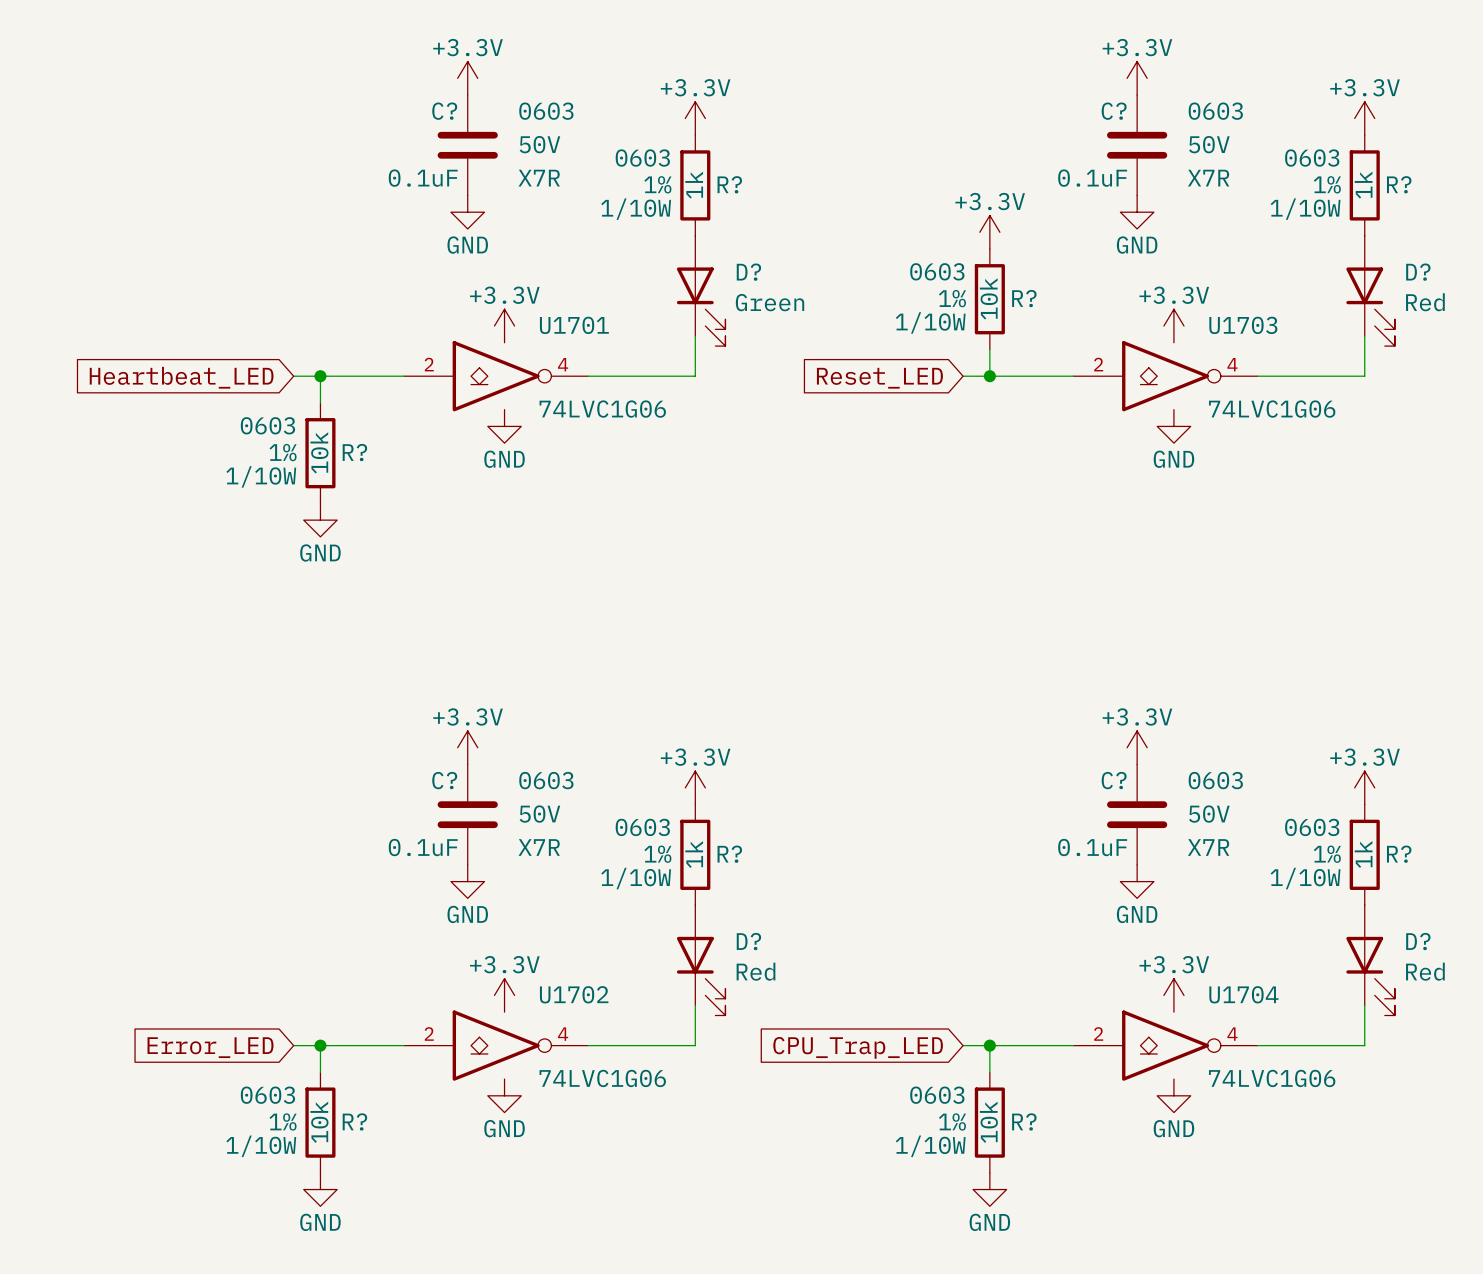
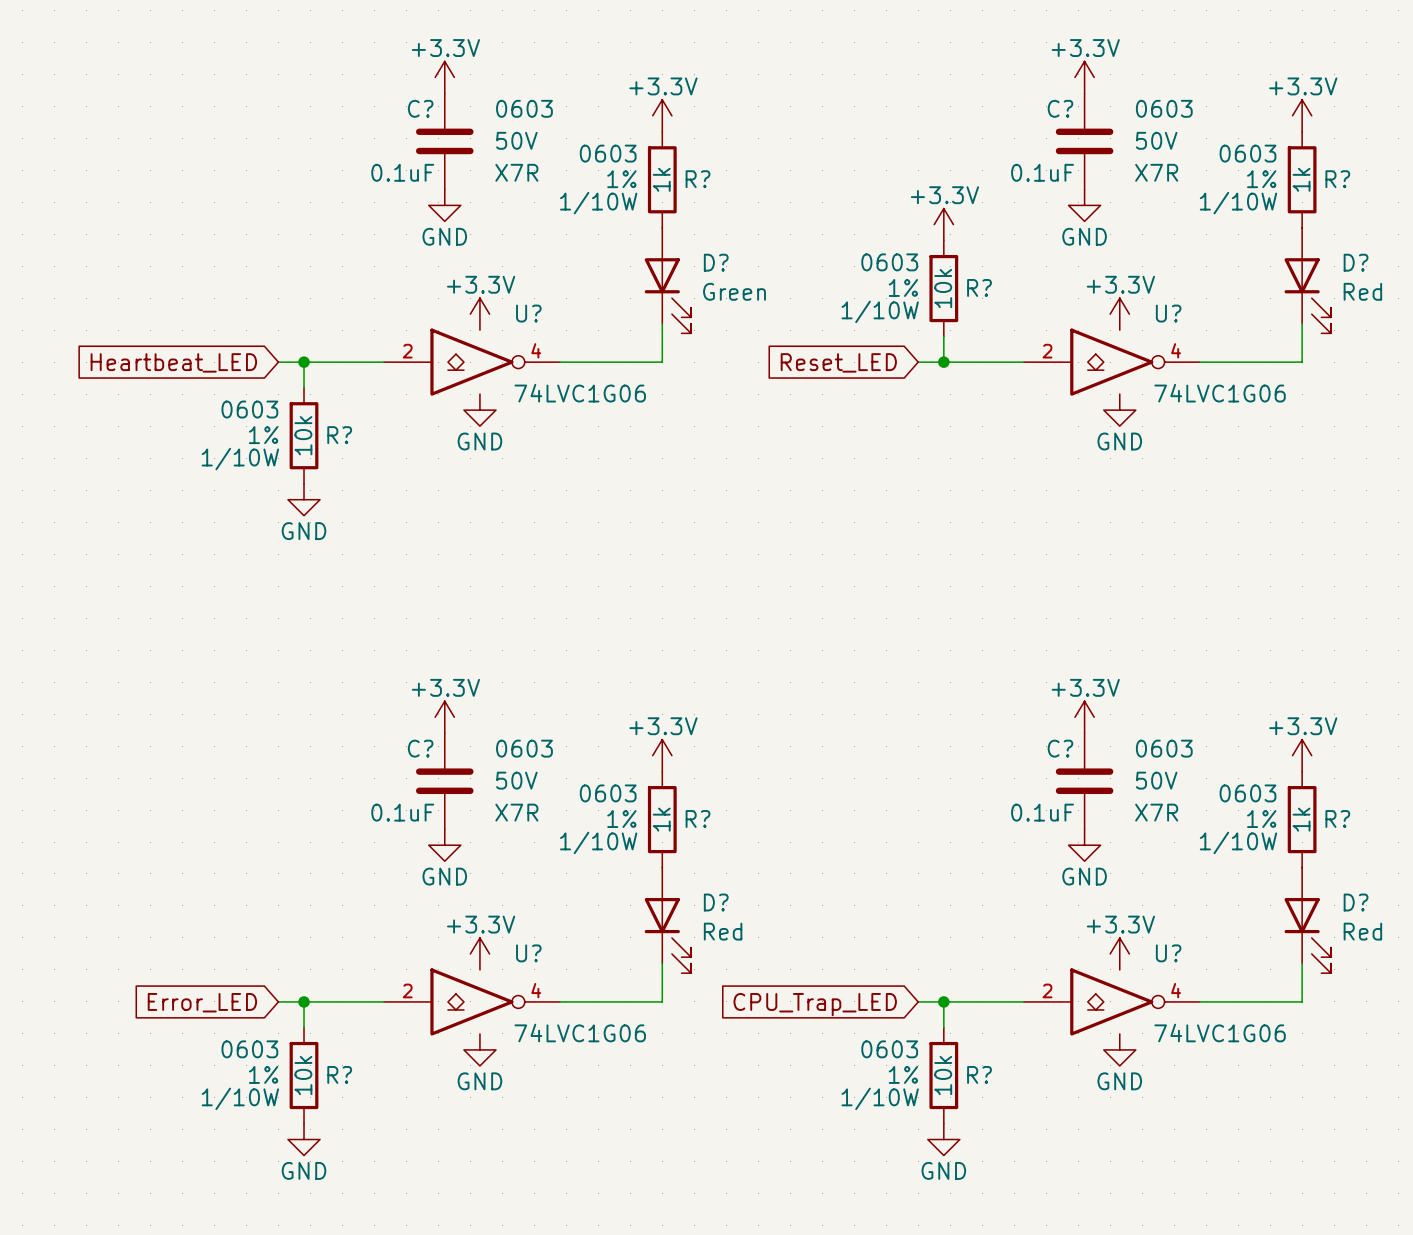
U1701 name: U1701 (574, 325) -> U? (528, 313)
U1703 name: U1703 (1243, 325) -> U? (1168, 313)
U1702 name: U1702 (574, 994) -> U? (528, 953)
U1704 name: U1704 (1243, 994) -> U? (1168, 953)

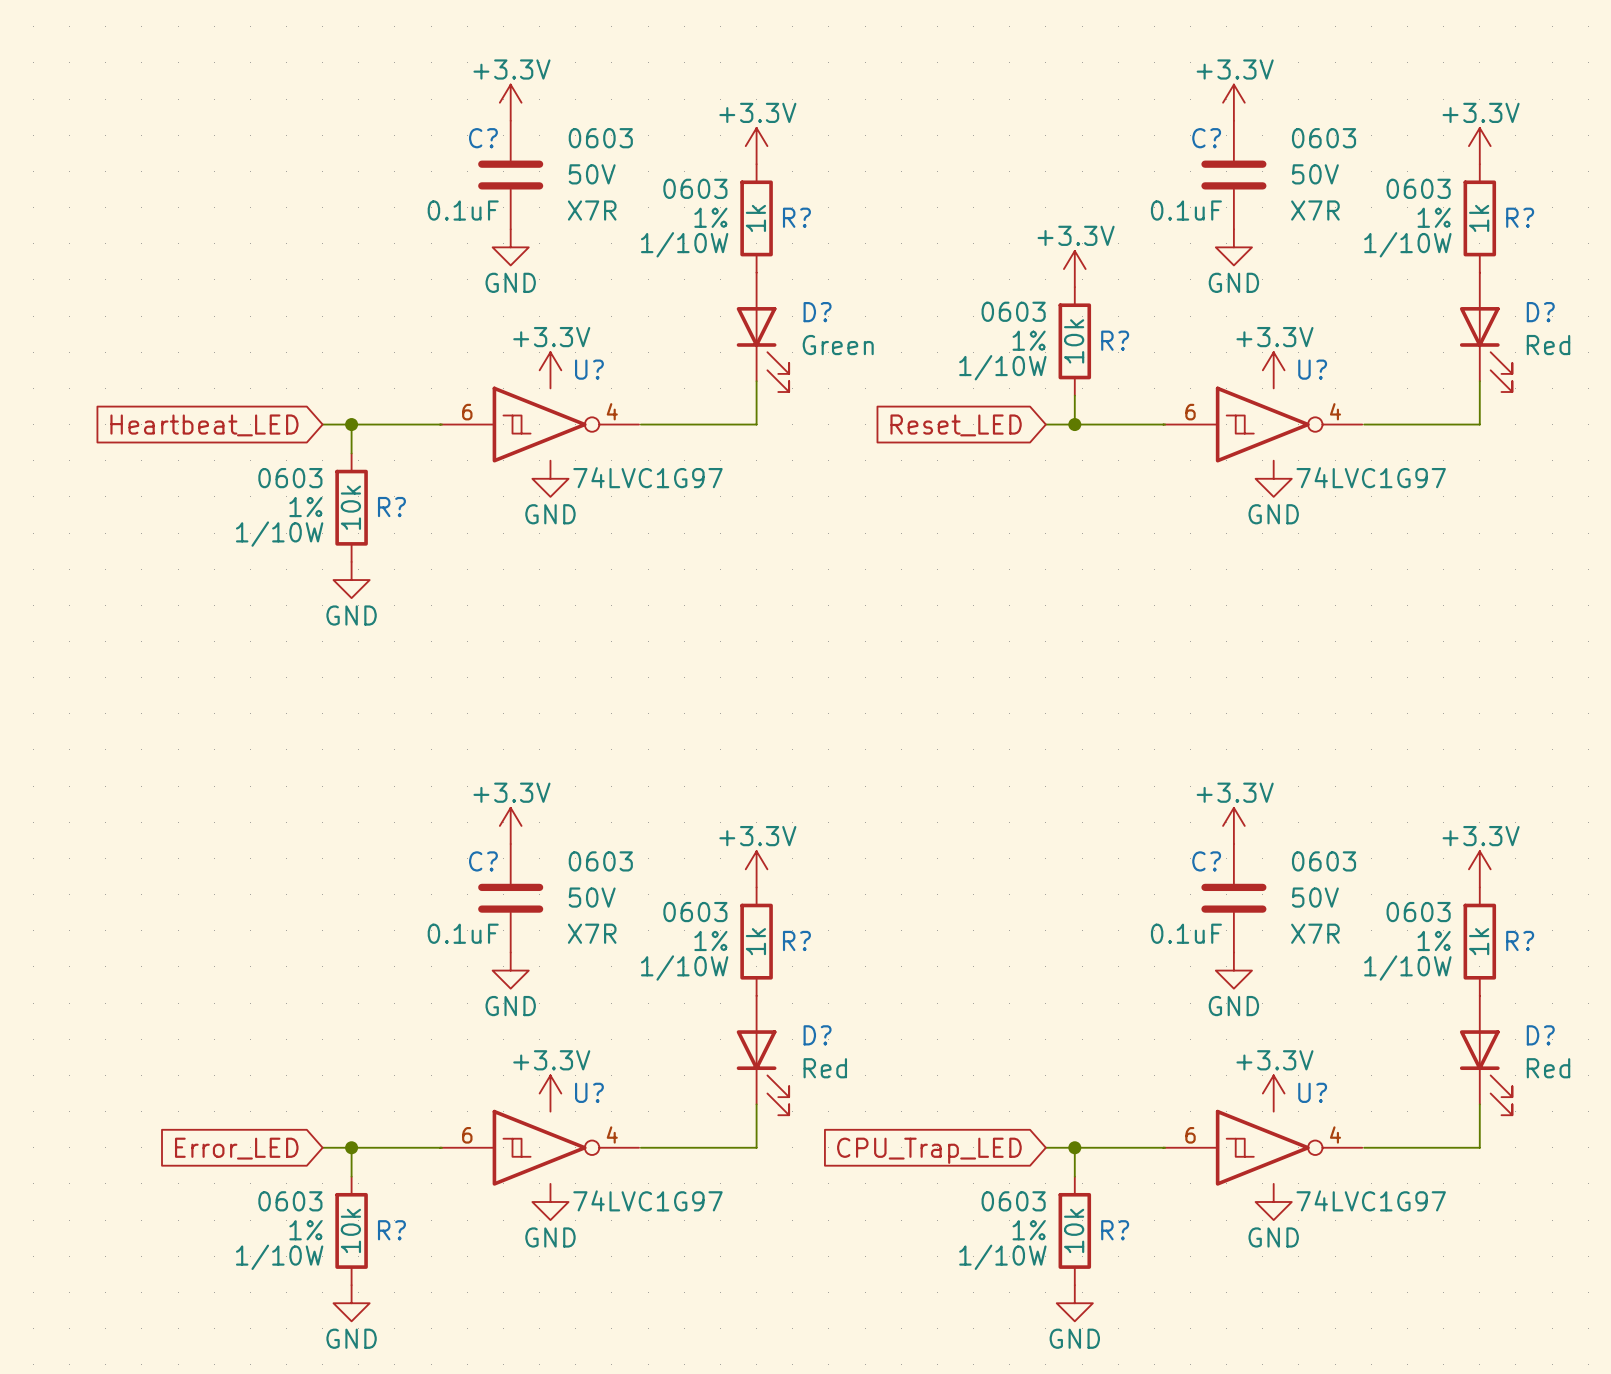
U? symbol: [383, 328, 560, 396] -> [440, 386, 640, 463]
U? symbol: [1023, 328, 1200, 396] -> [1163, 386, 1363, 463]
U? value: 74LVC1G06 (580, 393) -> 74LVC1G97 (647, 477)
U? value: 74LVC1G06 (1220, 393) -> 74LVC1G97 (1371, 477)
U? symbol: [383, 968, 560, 1036] -> [440, 1109, 640, 1186]
U? symbol: [1023, 968, 1200, 1036] -> [1163, 1109, 1363, 1186]
U? value: 74LVC1G06 (580, 1032) -> 74LVC1G97 (647, 1200)
U? value: 74LVC1G06 (1220, 1032) -> 74LVC1G97 (1371, 1200)

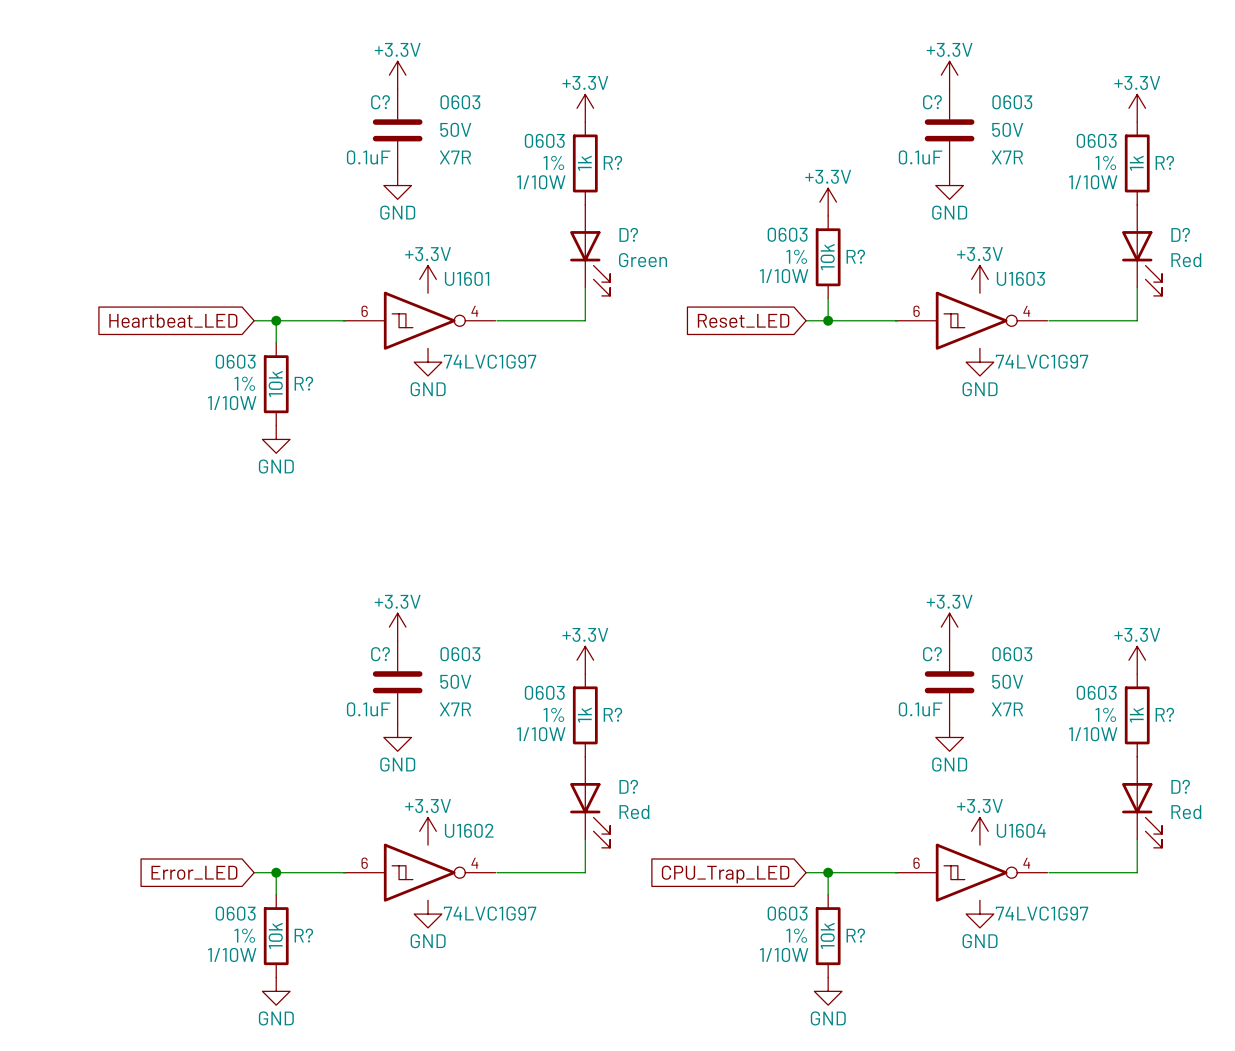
U? name: U? (589, 369) -> U1601 (467, 278)
U? name: U? (1312, 369) -> U1603 (1020, 278)
U? name: U? (589, 1092) -> U1602 (469, 830)
U? name: U? (1312, 1092) -> U1604 (1021, 830)

